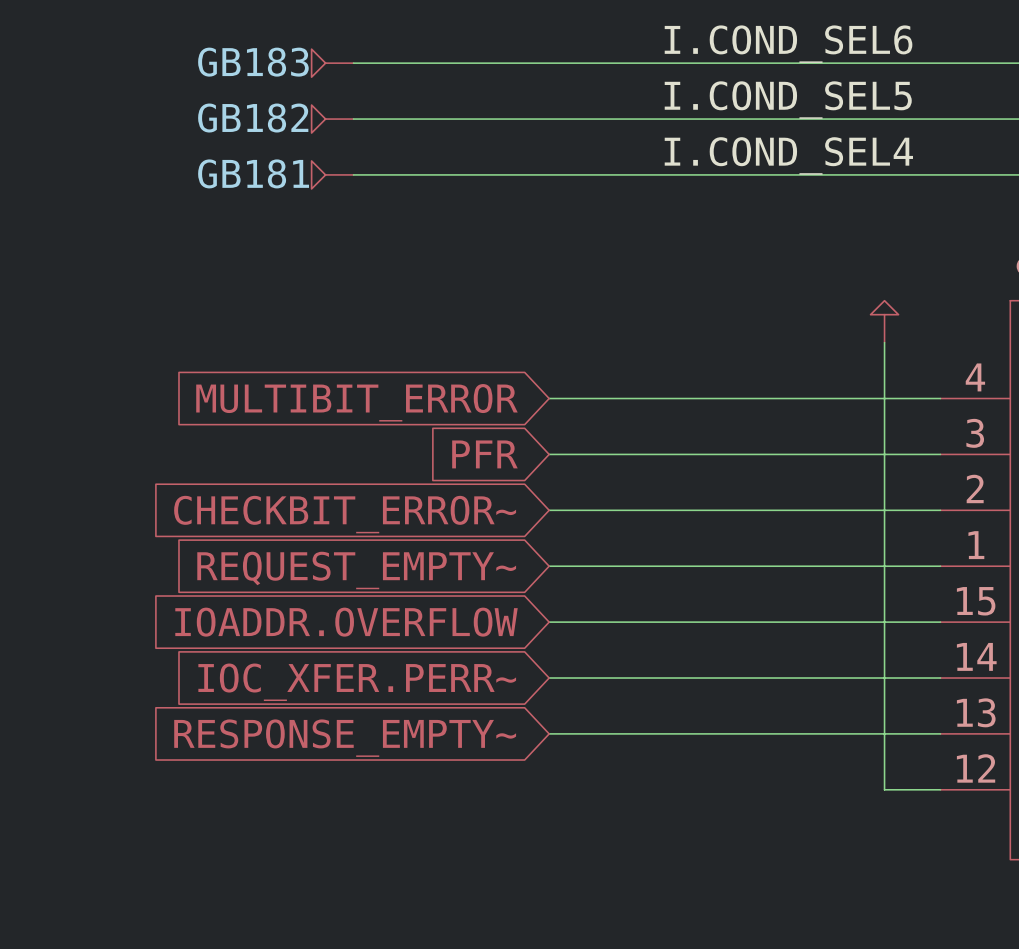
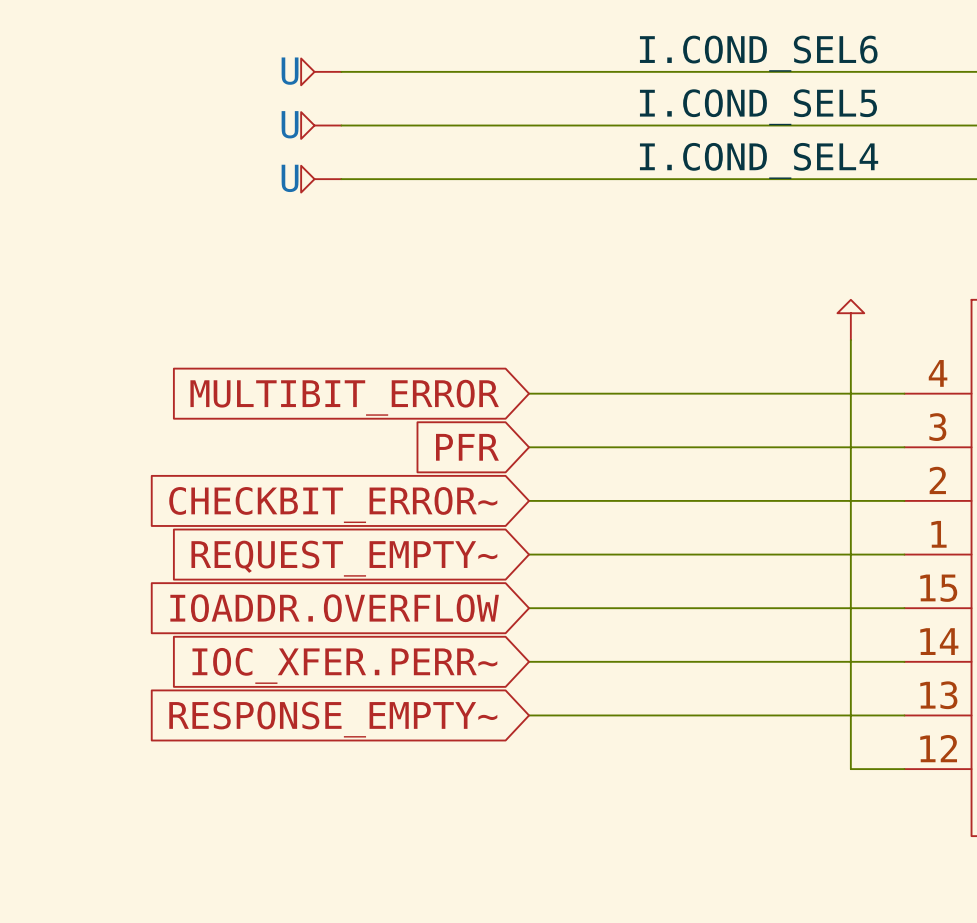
GB183 name: GB183 (253, 62) -> U (290, 71)
GB182 name: GB182 (253, 118) -> U (290, 124)
GB181 name: GB181 (253, 173) -> U (290, 178)

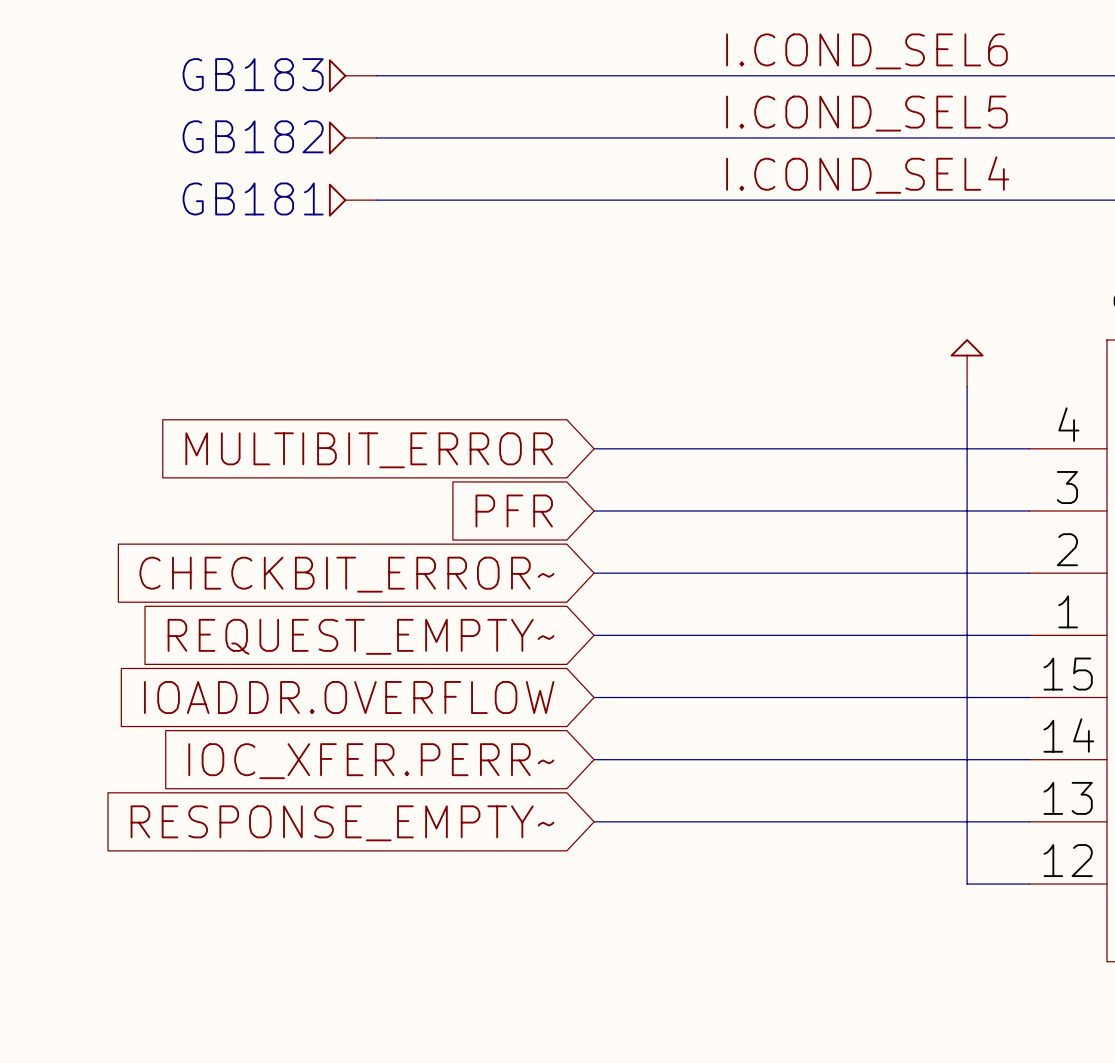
U name: U (290, 71) -> GB183 (253, 74)
U name: U (290, 124) -> GB182 (253, 136)
U name: U (290, 178) -> GB181 (253, 198)

